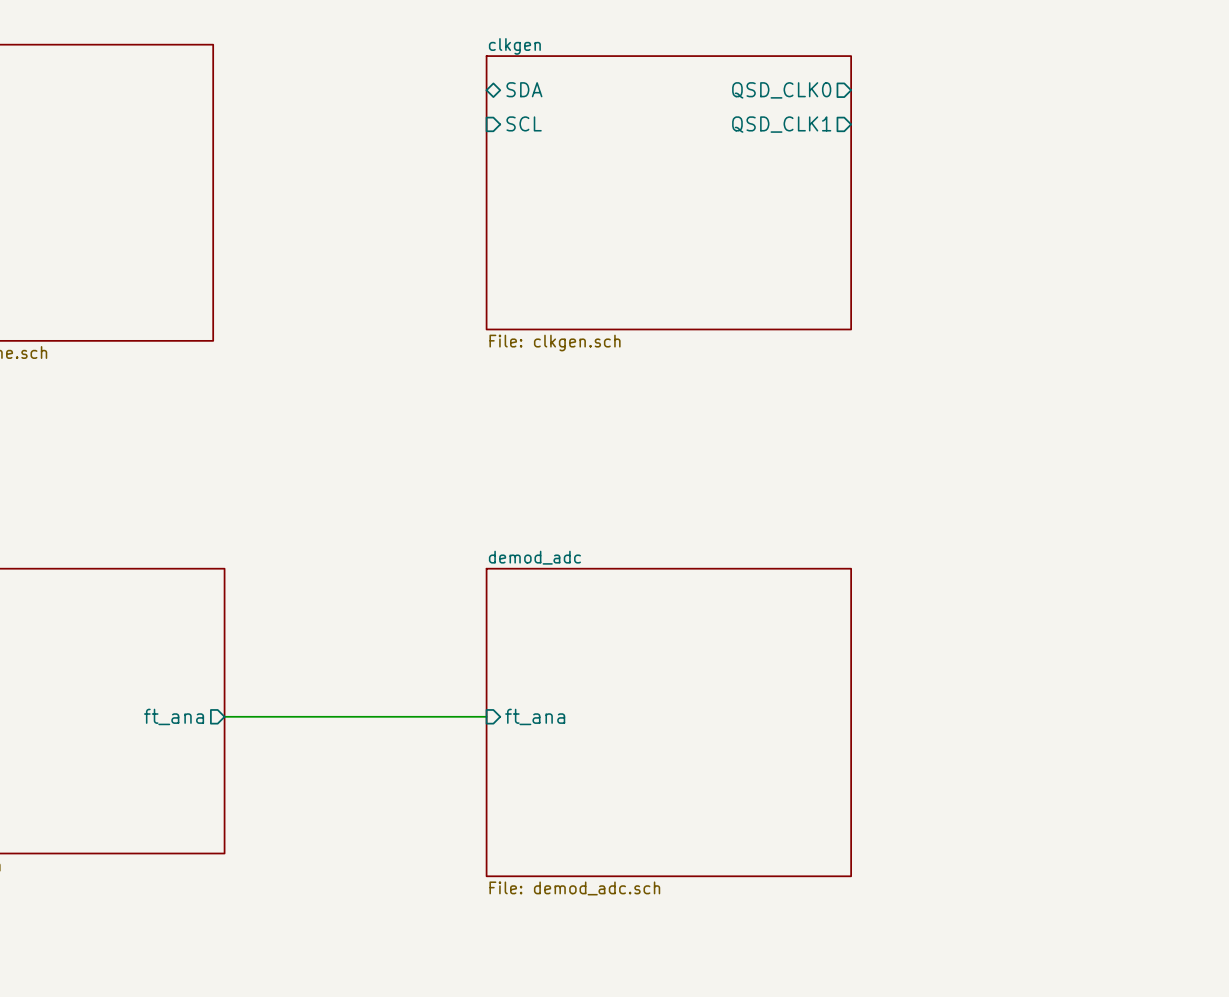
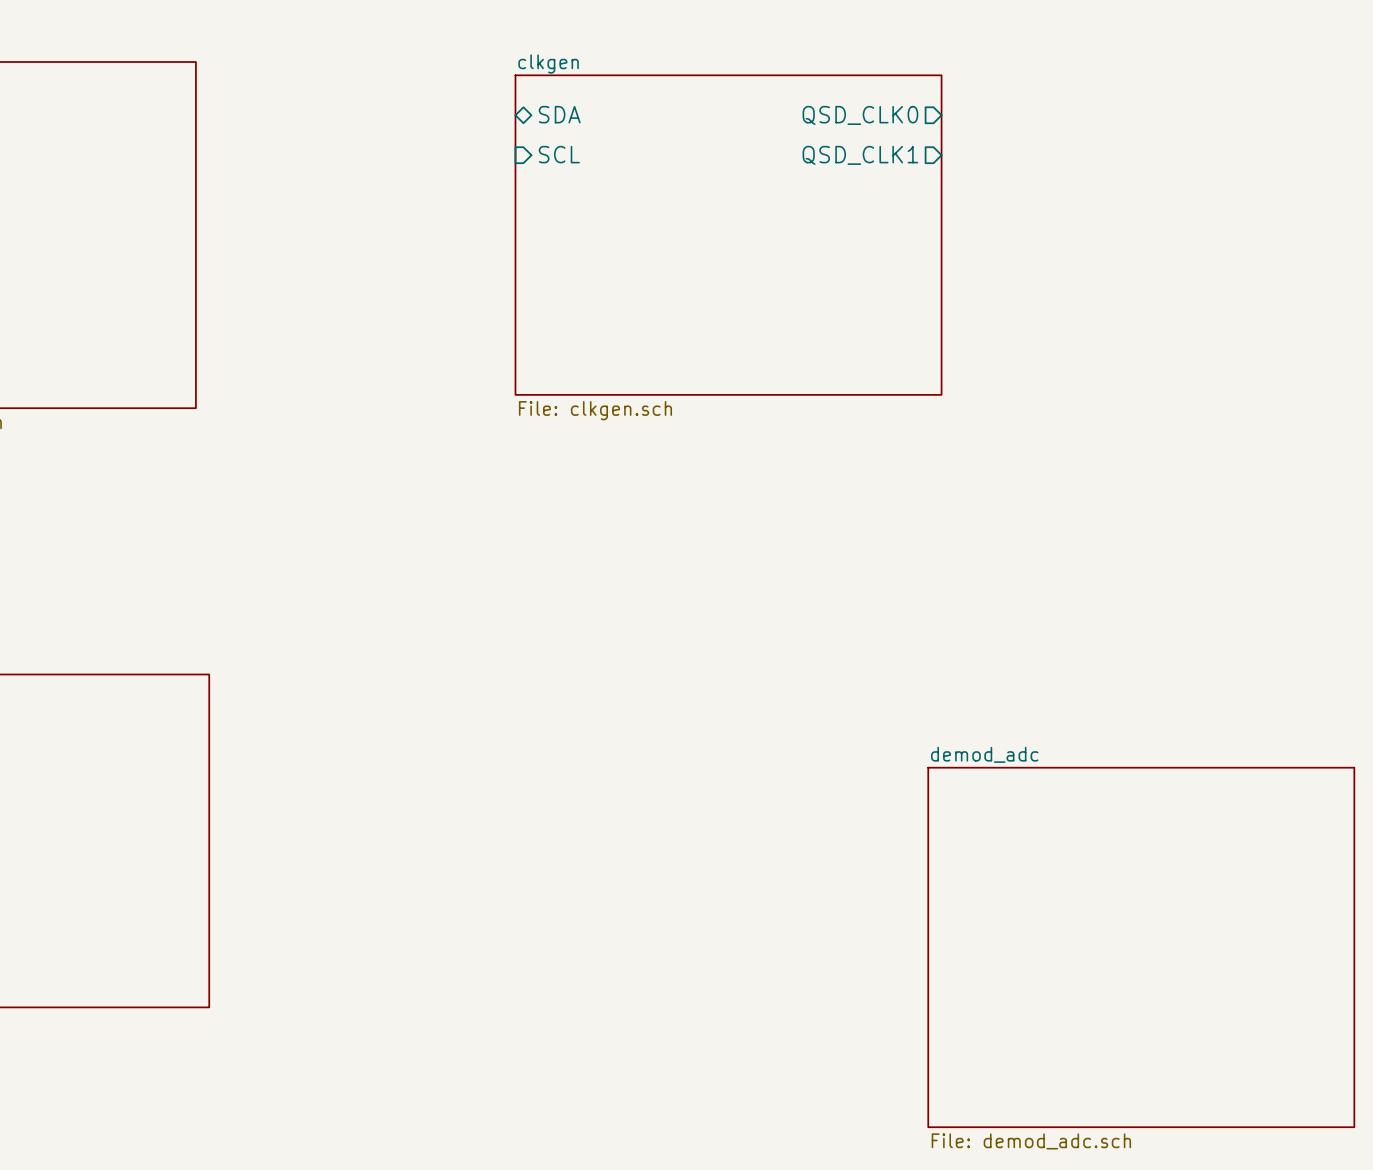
sheet pin: ft_ana (174, 716) -> none
wire: (224, 716) (486, 716) -> none
sheet pin: ft_ana (535, 716) -> none
sheet demod_adc: File: demod_adc.sch (668, 722) -> none
sheet demod_adc: none -> File: demod_adc.sch (1141, 947)

